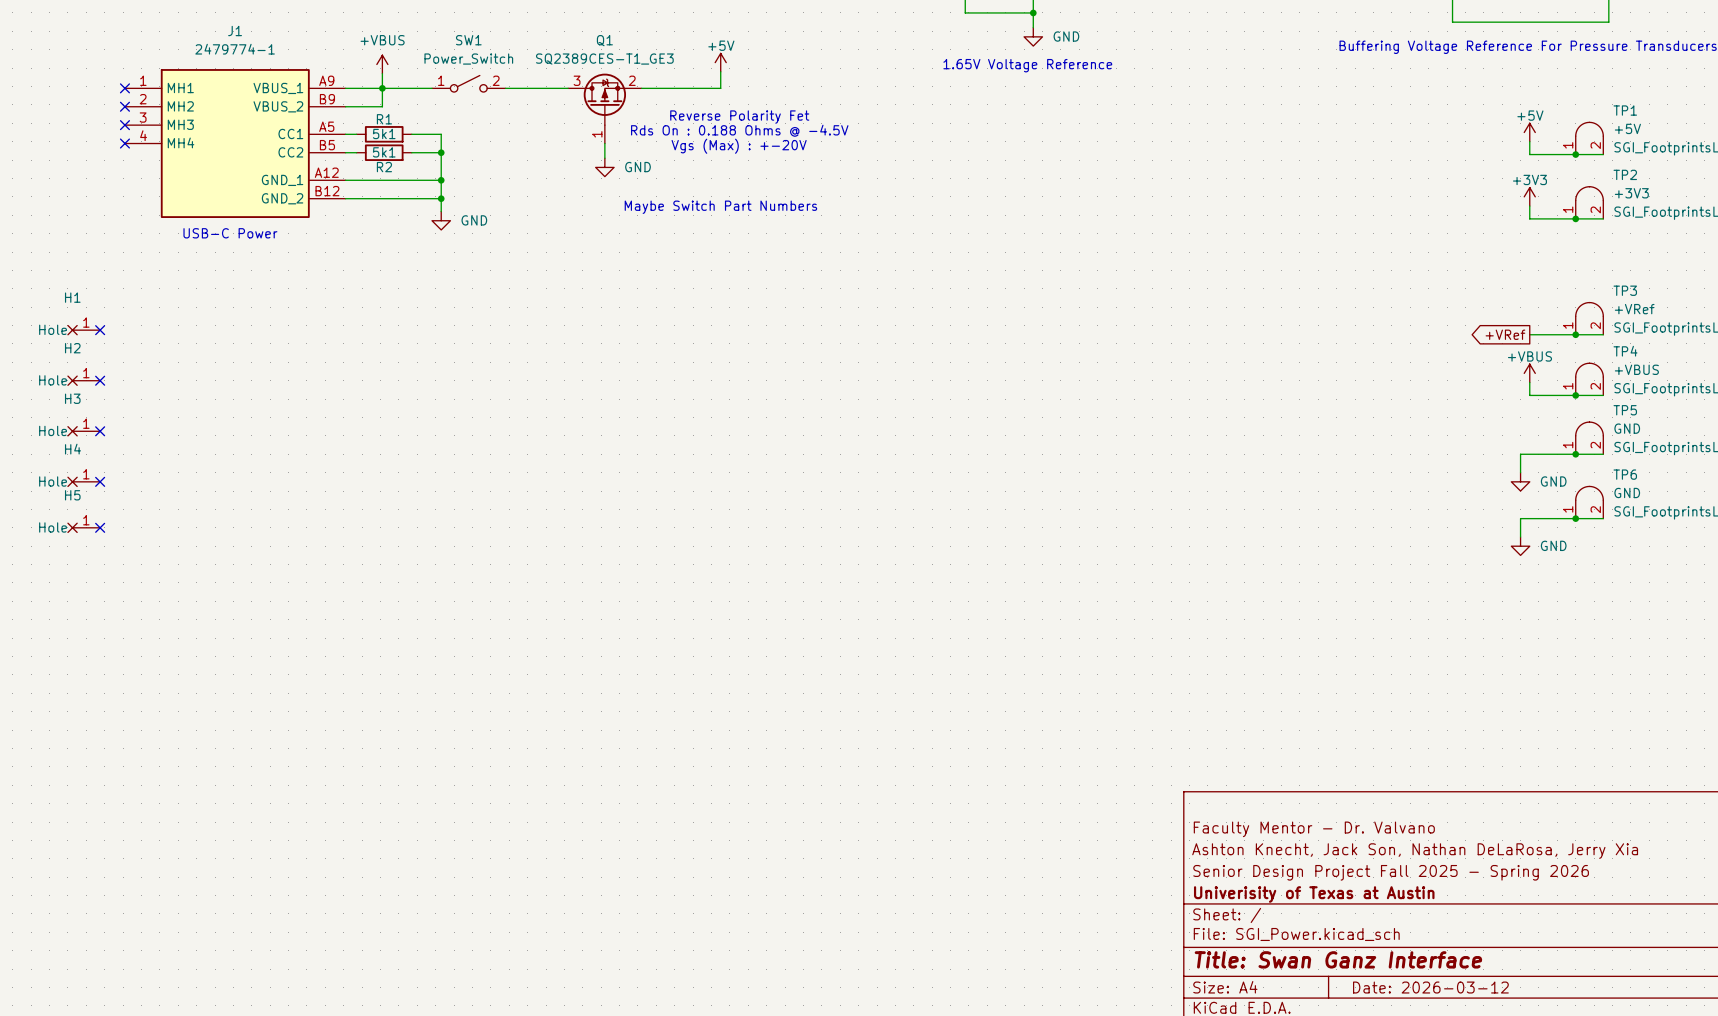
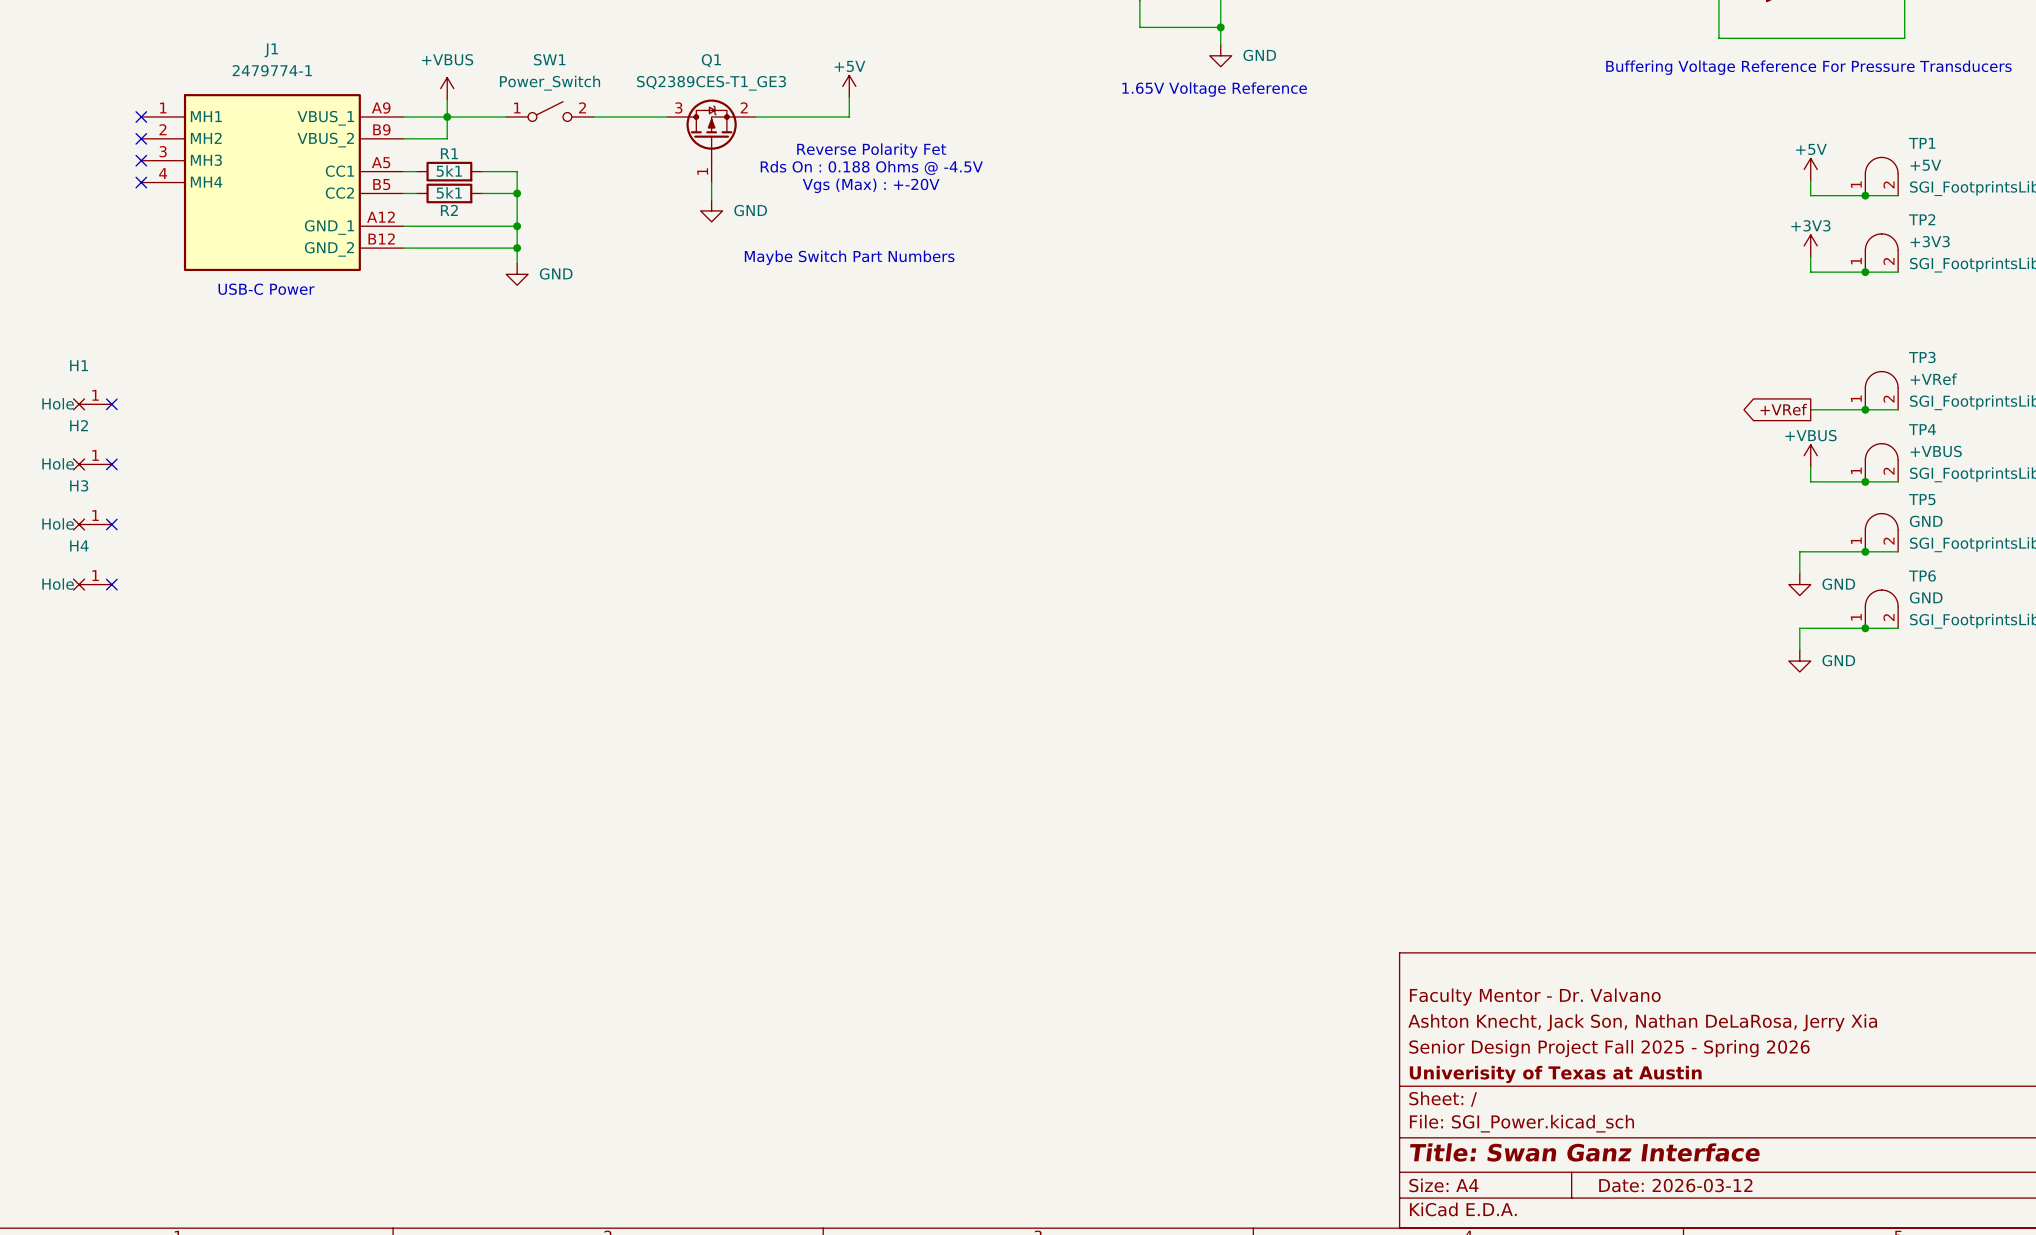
H5: (84, 527) -> none
no-connect mark: (100, 527) -> none

